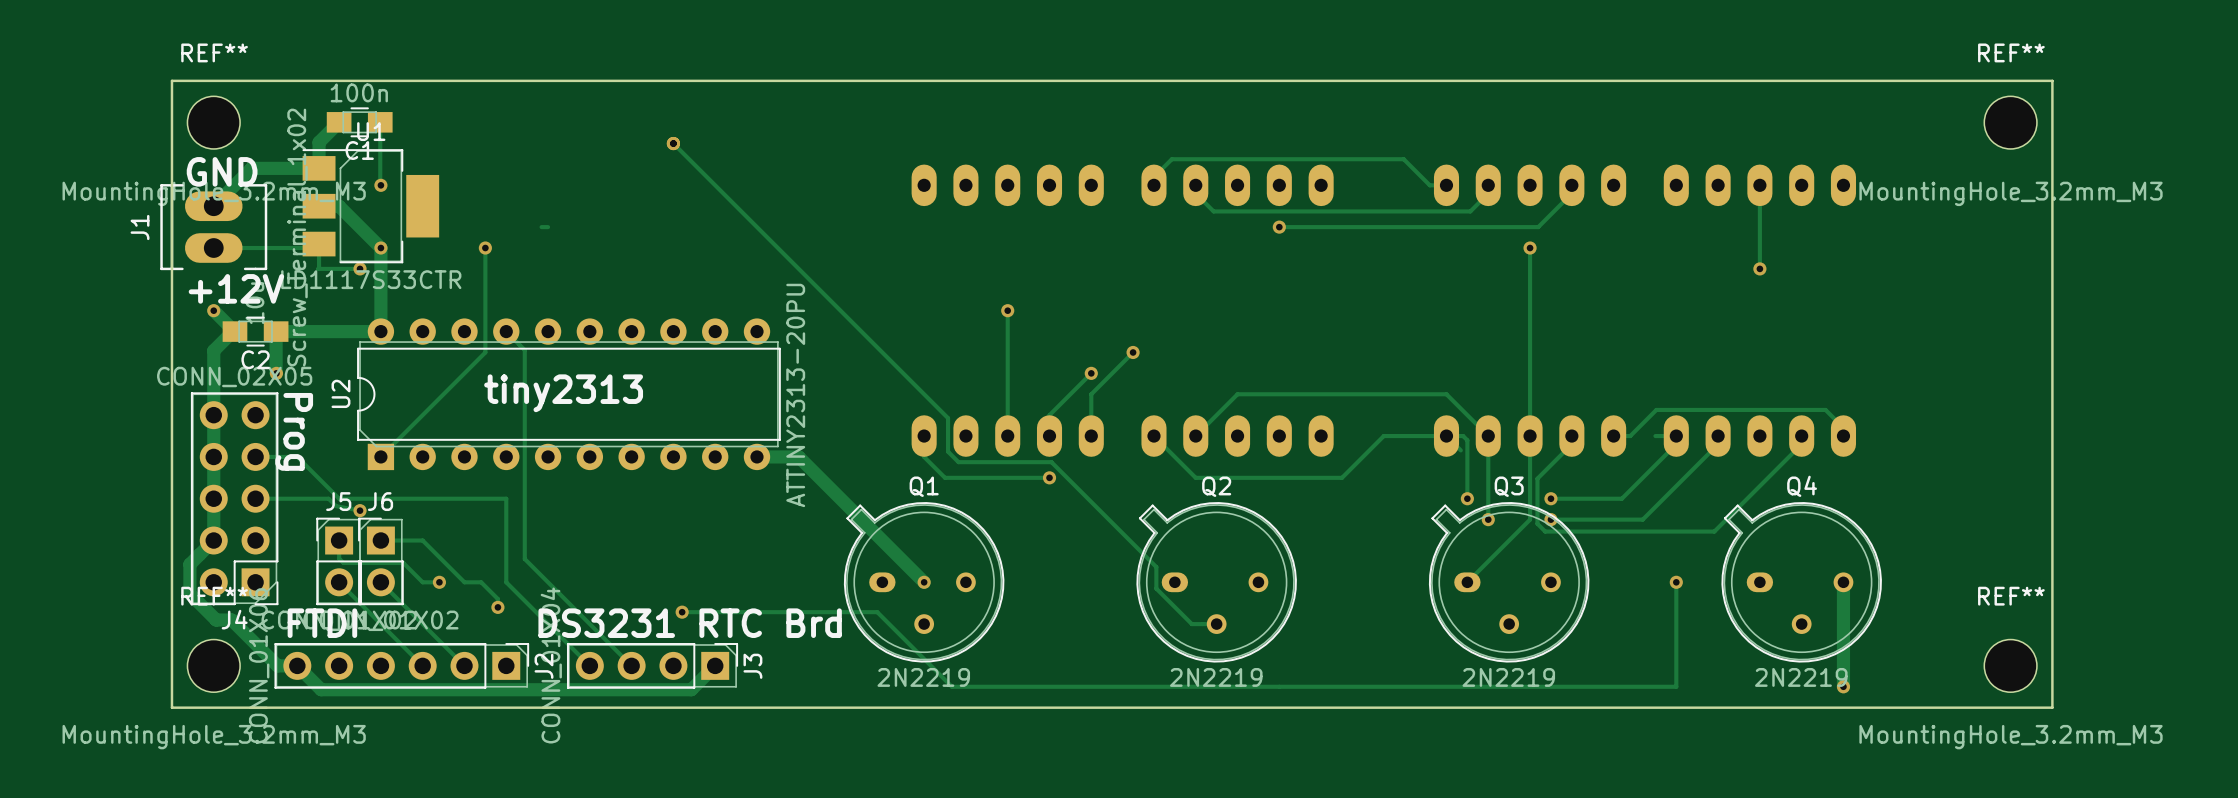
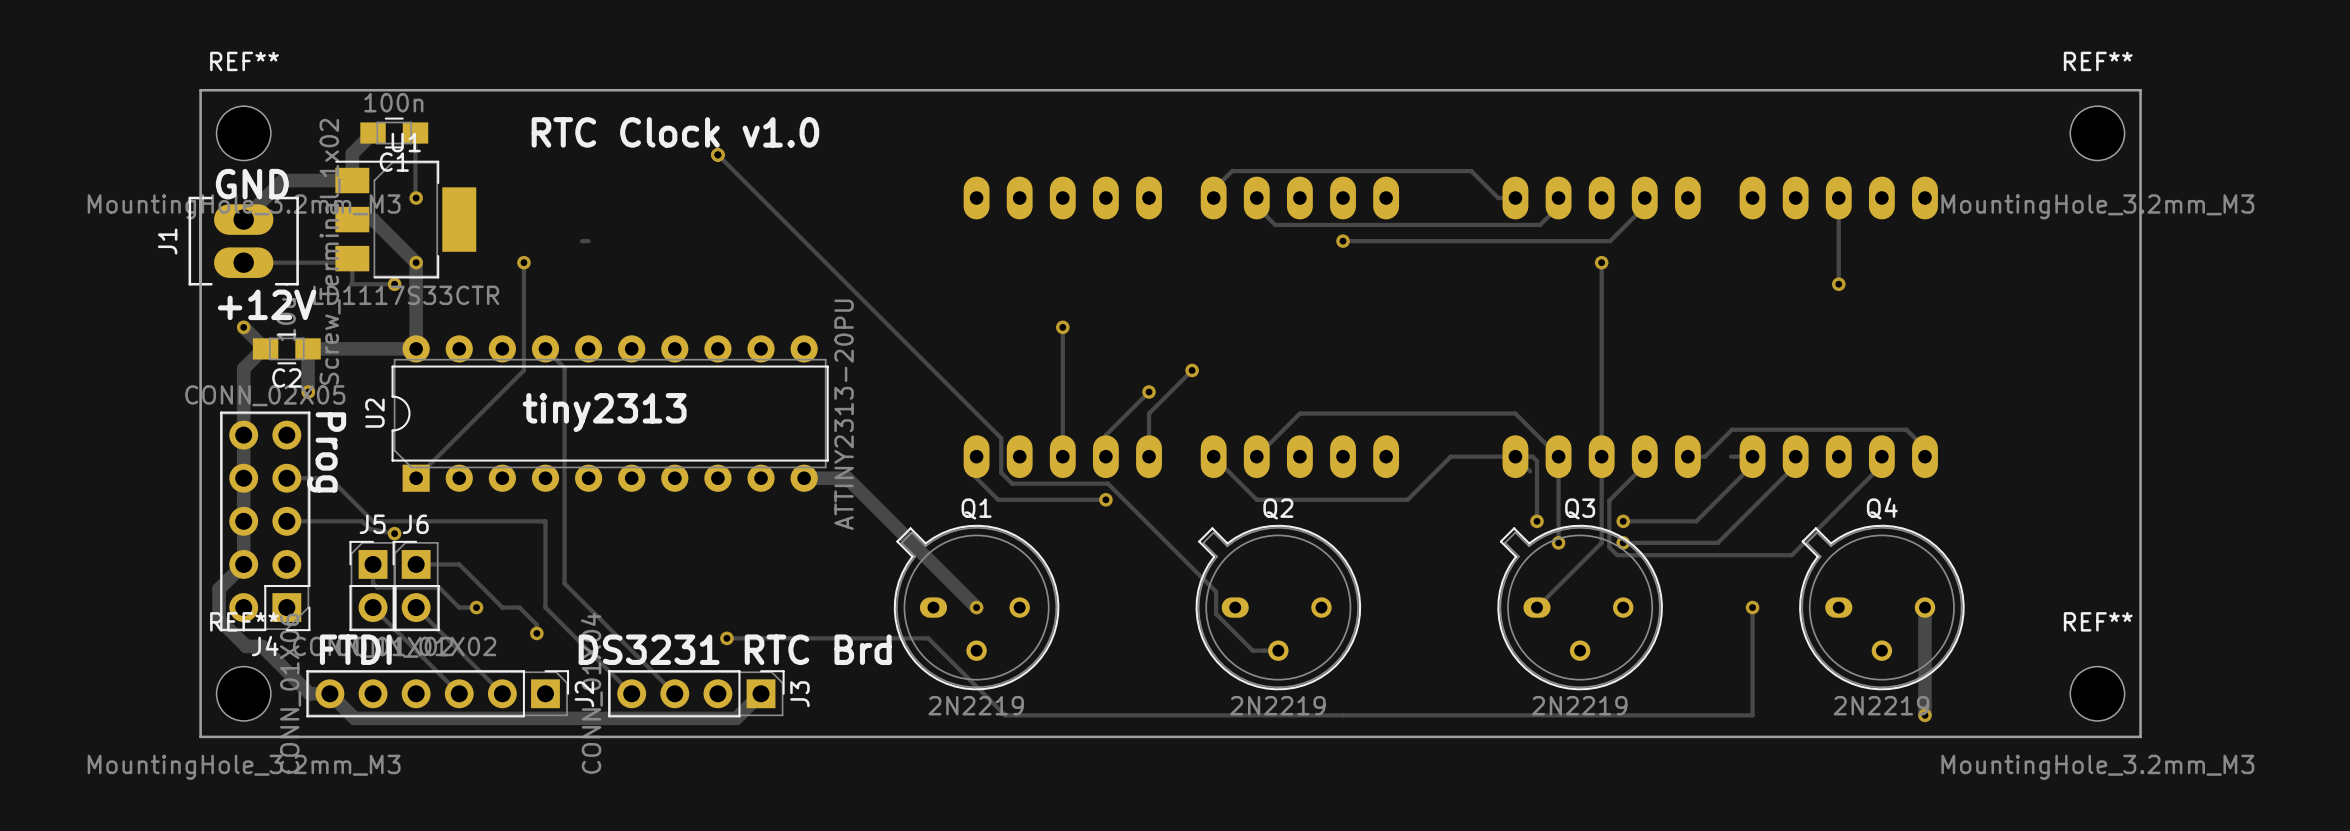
text: none -> RTC Clock v1.0 (675, 132)

